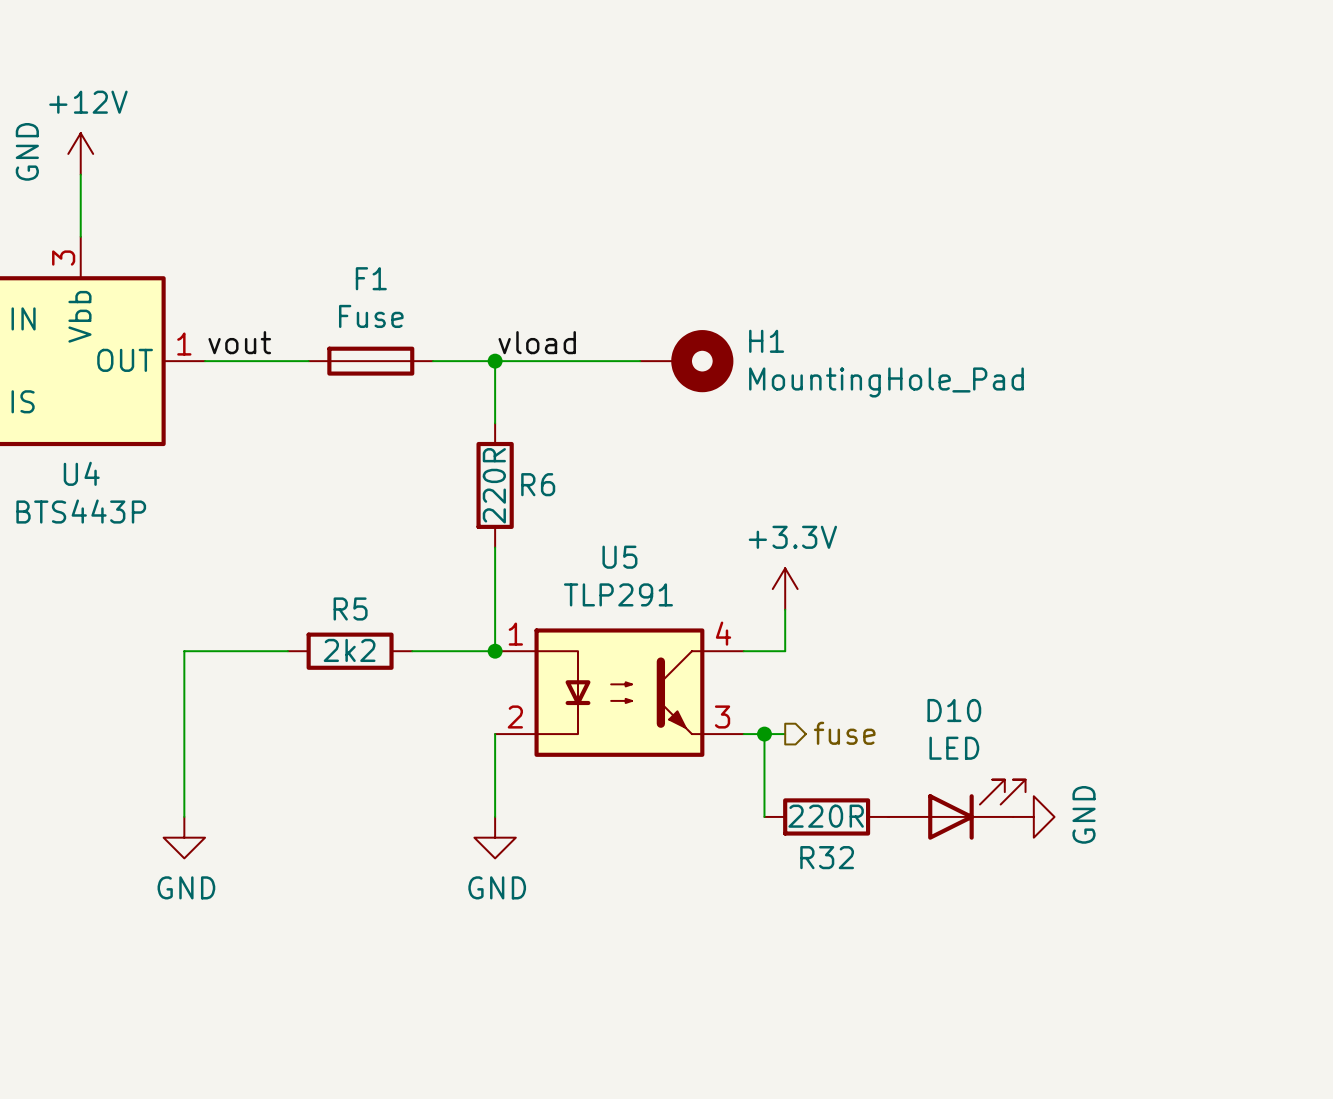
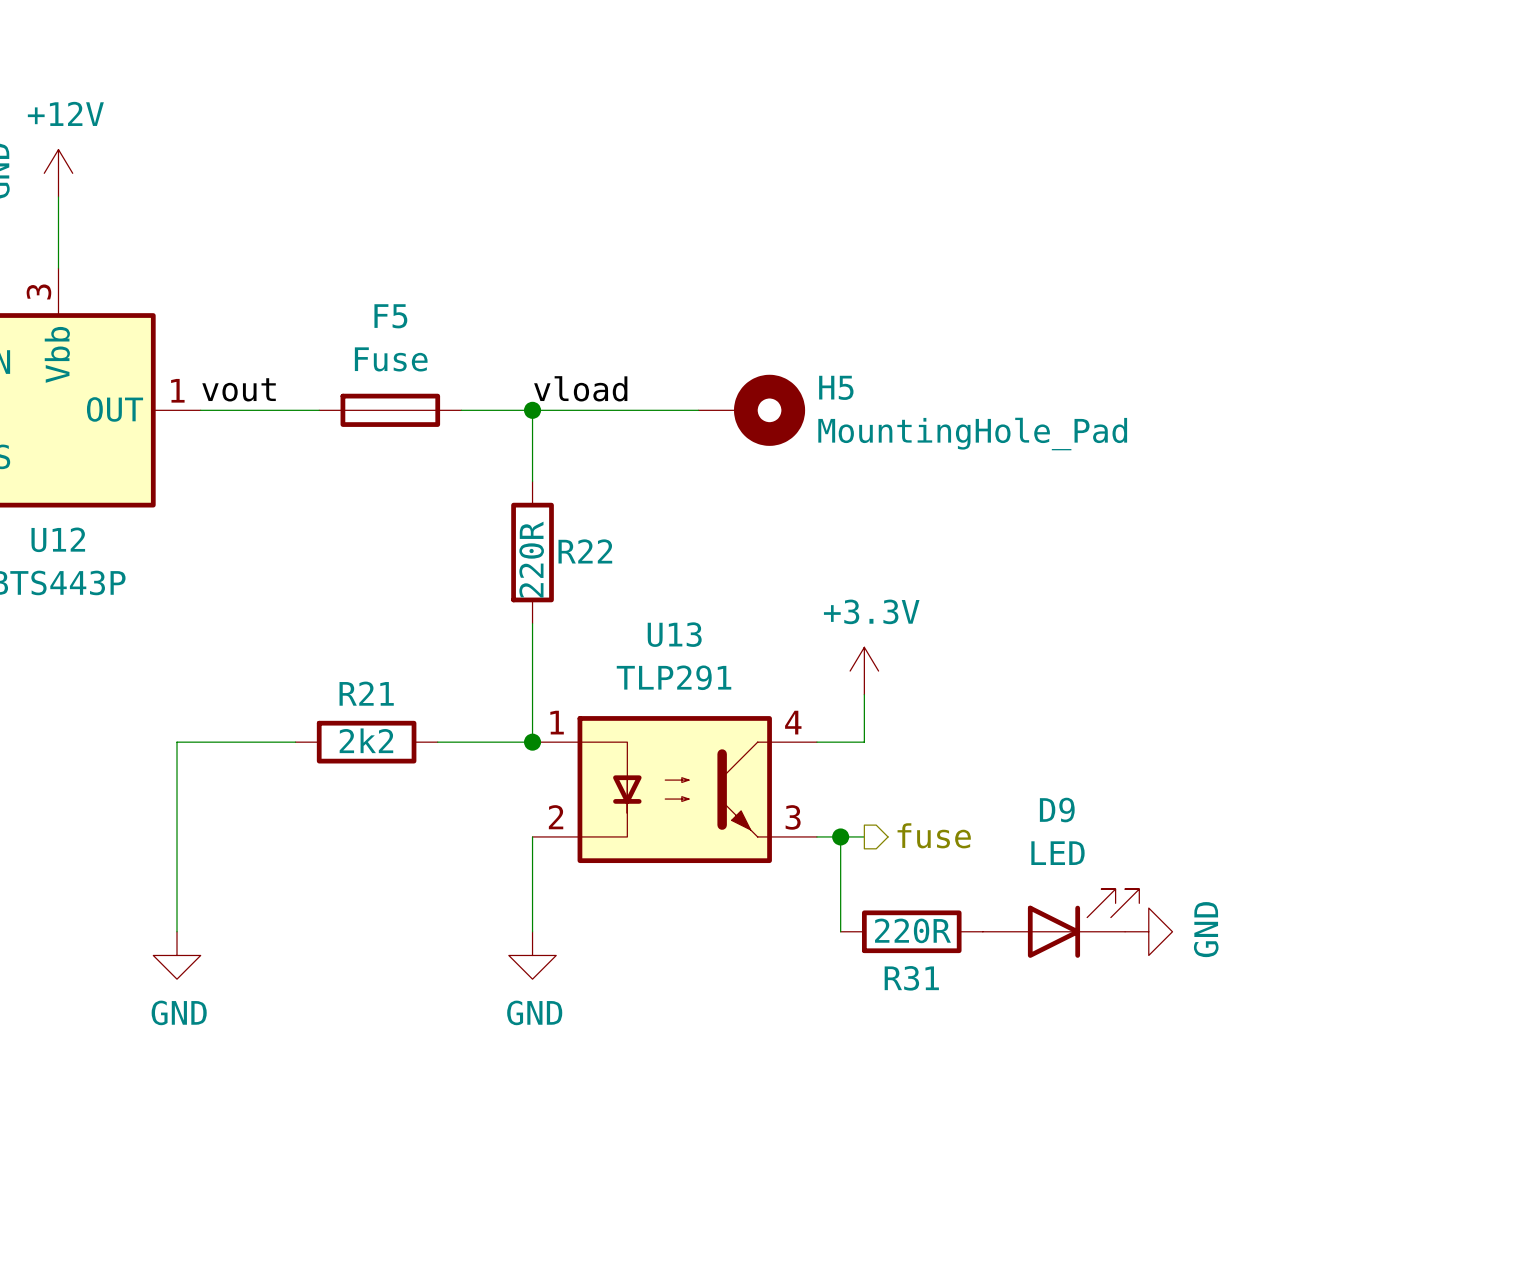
F1 name: F1 (371, 278) -> F5 (390, 316)
H1 name: H1 (766, 341) -> H5 (836, 387)
U4 name: U4 (81, 473) -> U12 (58, 539)
R6 name: R6 (538, 484) -> R22 (585, 551)
U5 name: U5 (619, 557) -> U13 (674, 634)
R5 name: R5 (350, 608) -> R21 (366, 693)
D10 name: D10 (954, 710) -> D9 (1057, 810)
R32 name: R32 (827, 857) -> R31 (911, 978)

